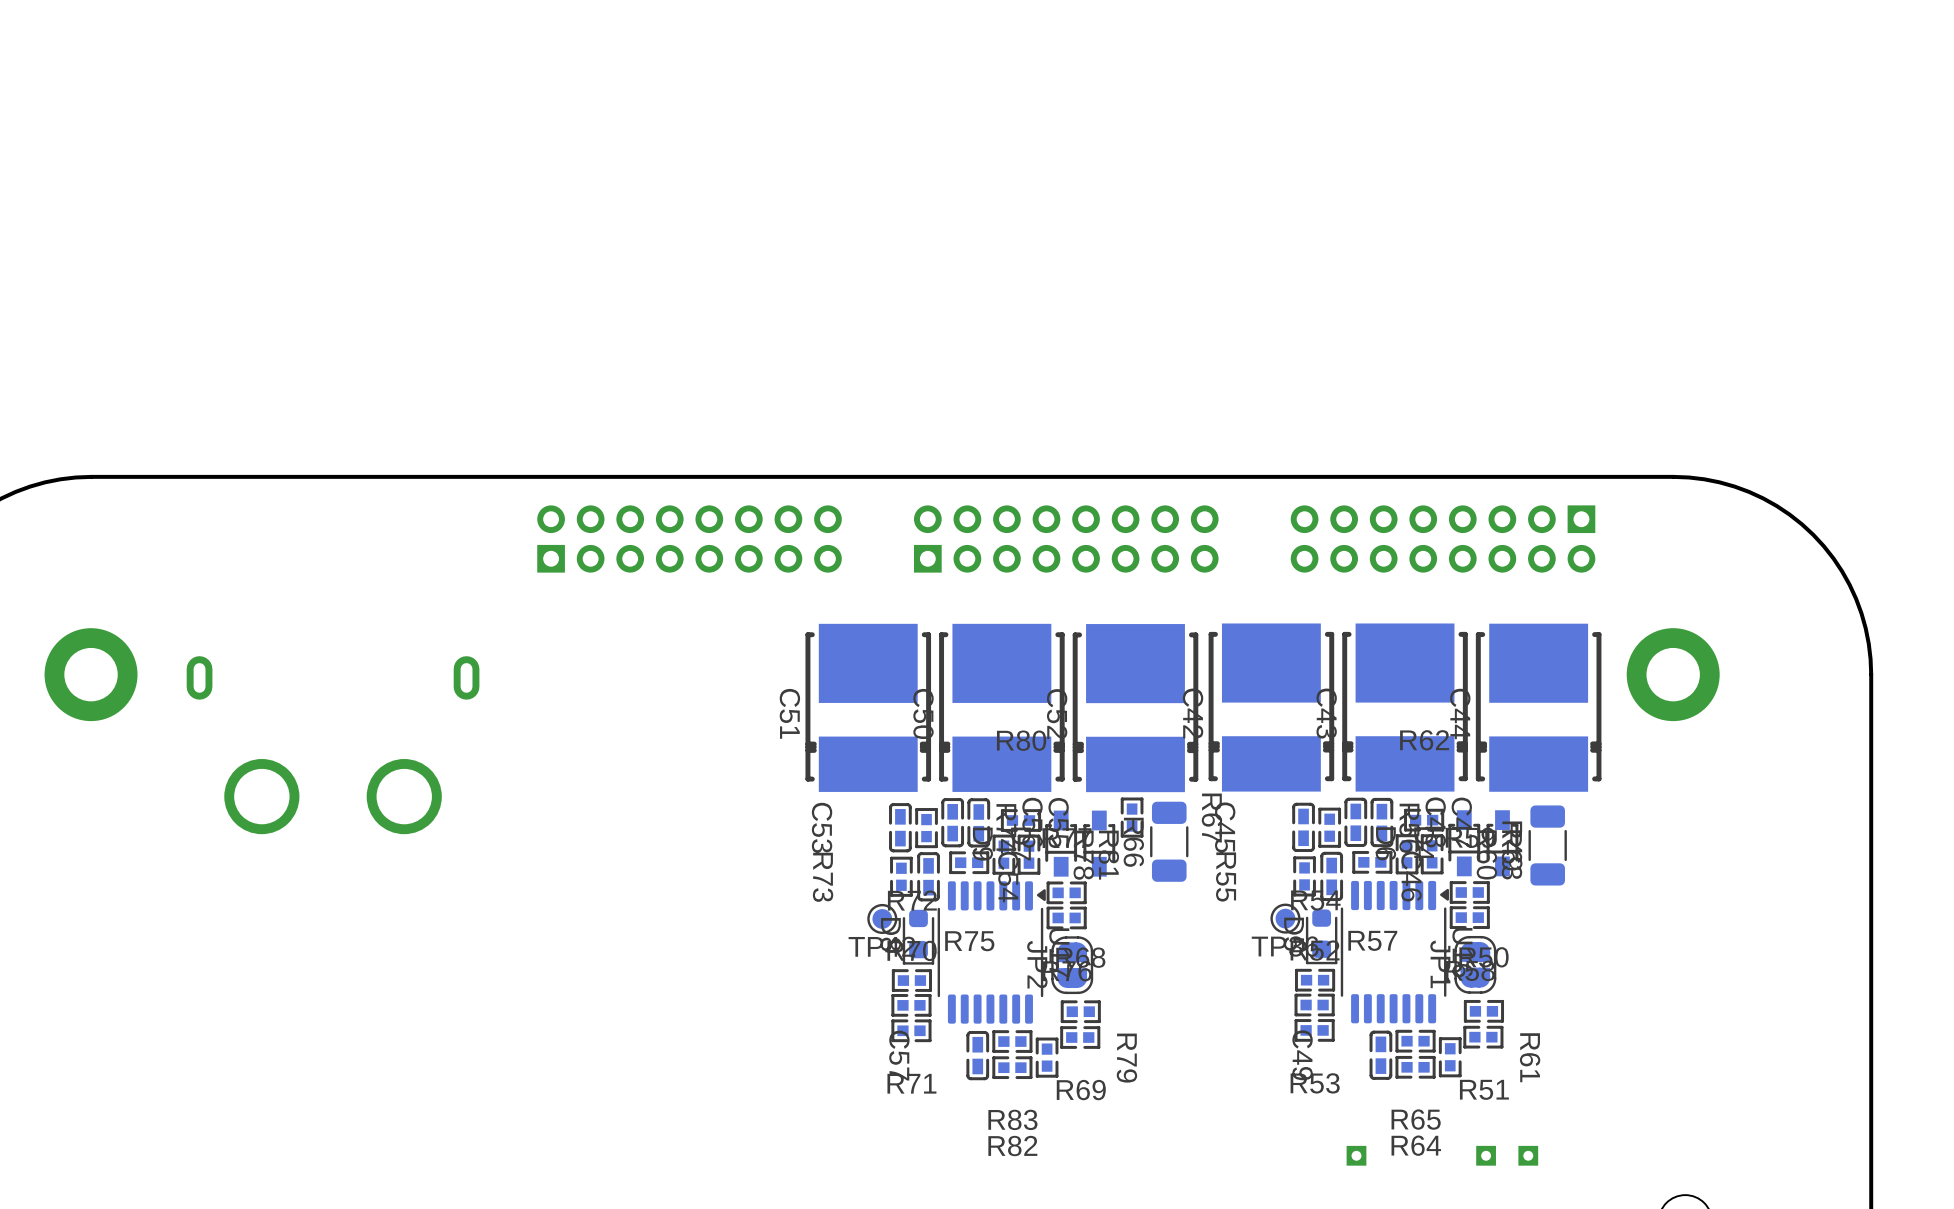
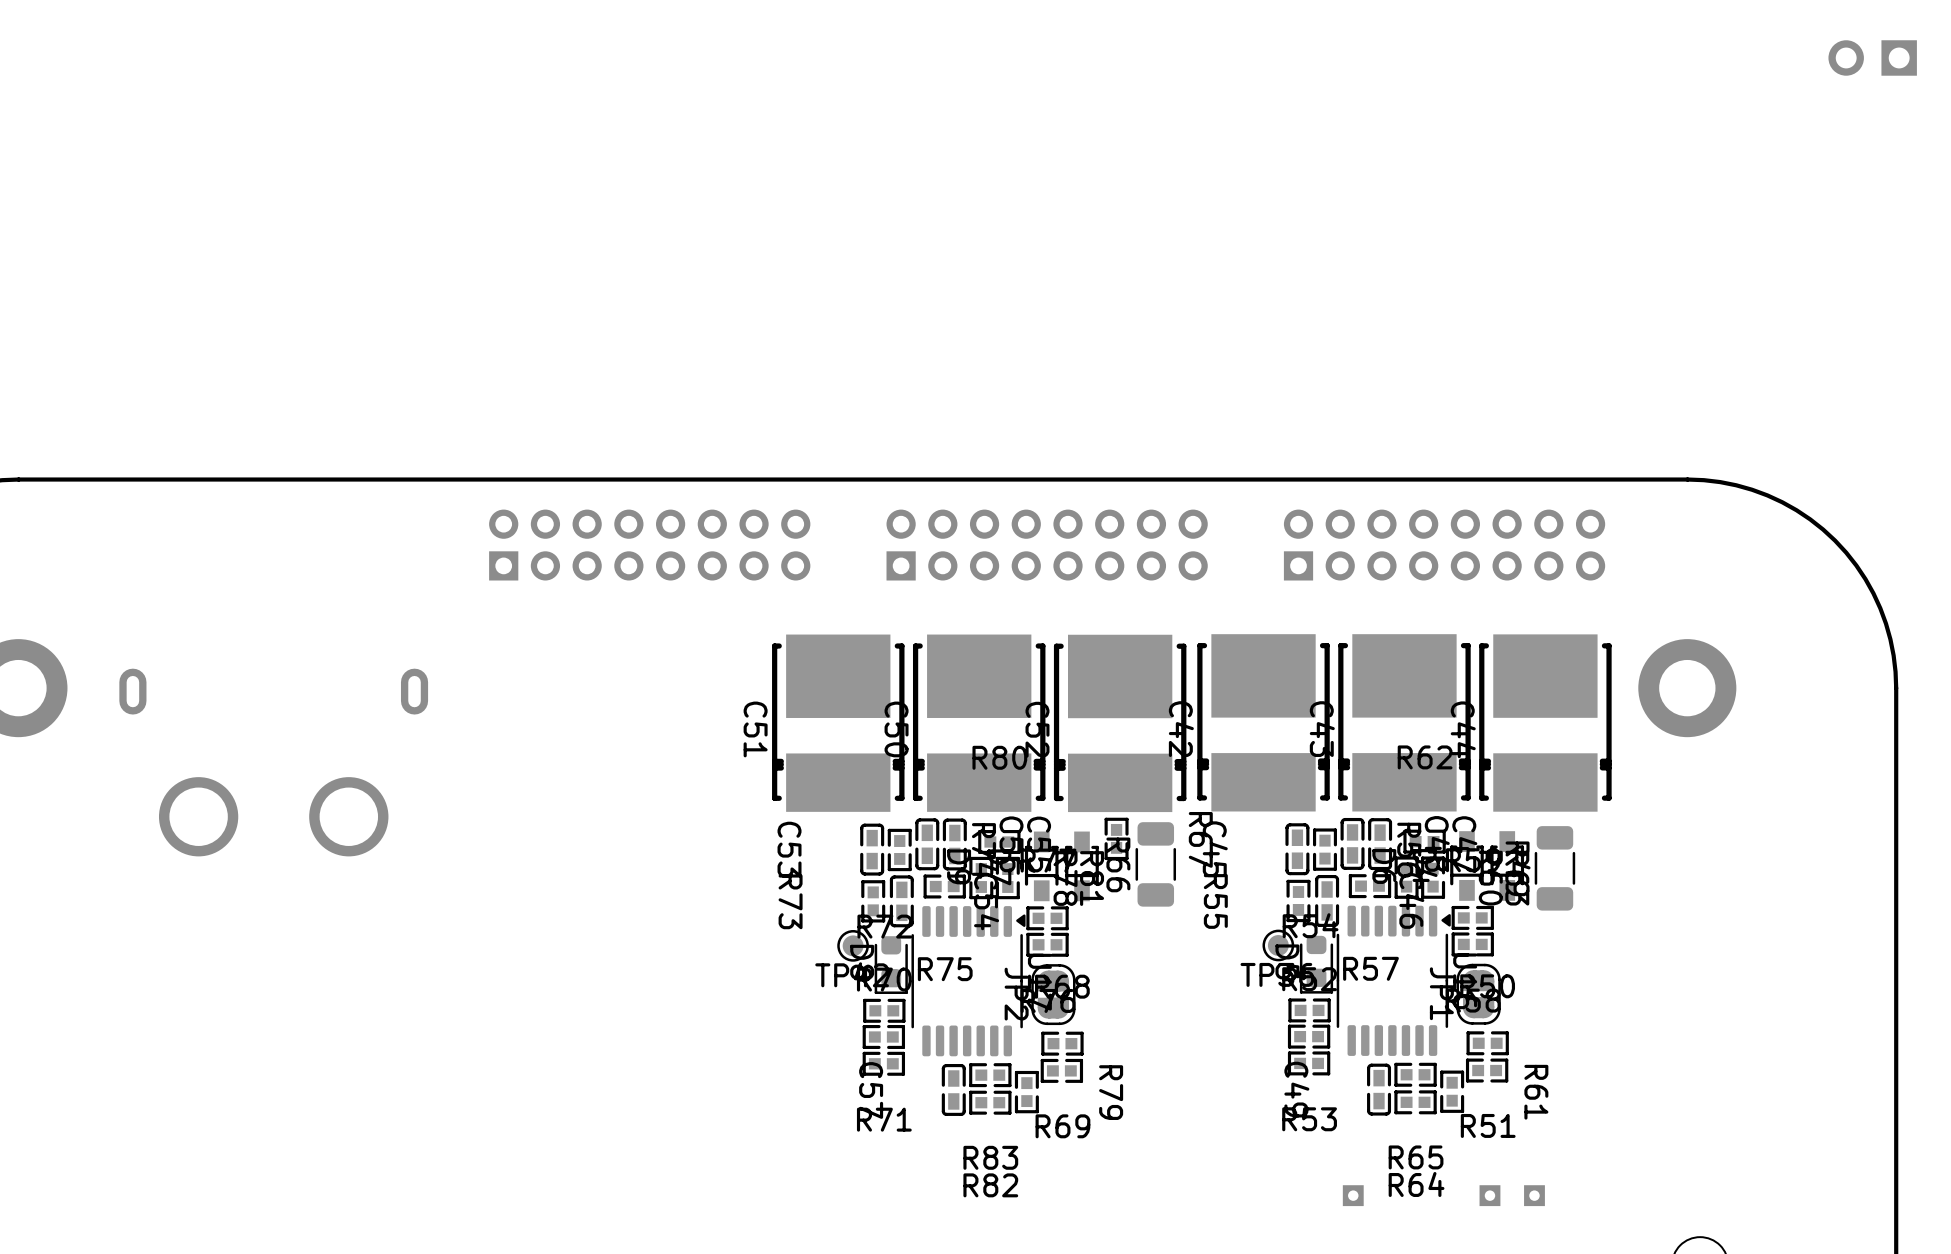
part: none -> (1872, 57)
part rotation: 0° (1443, 538) -> 180° (1444, 545)

